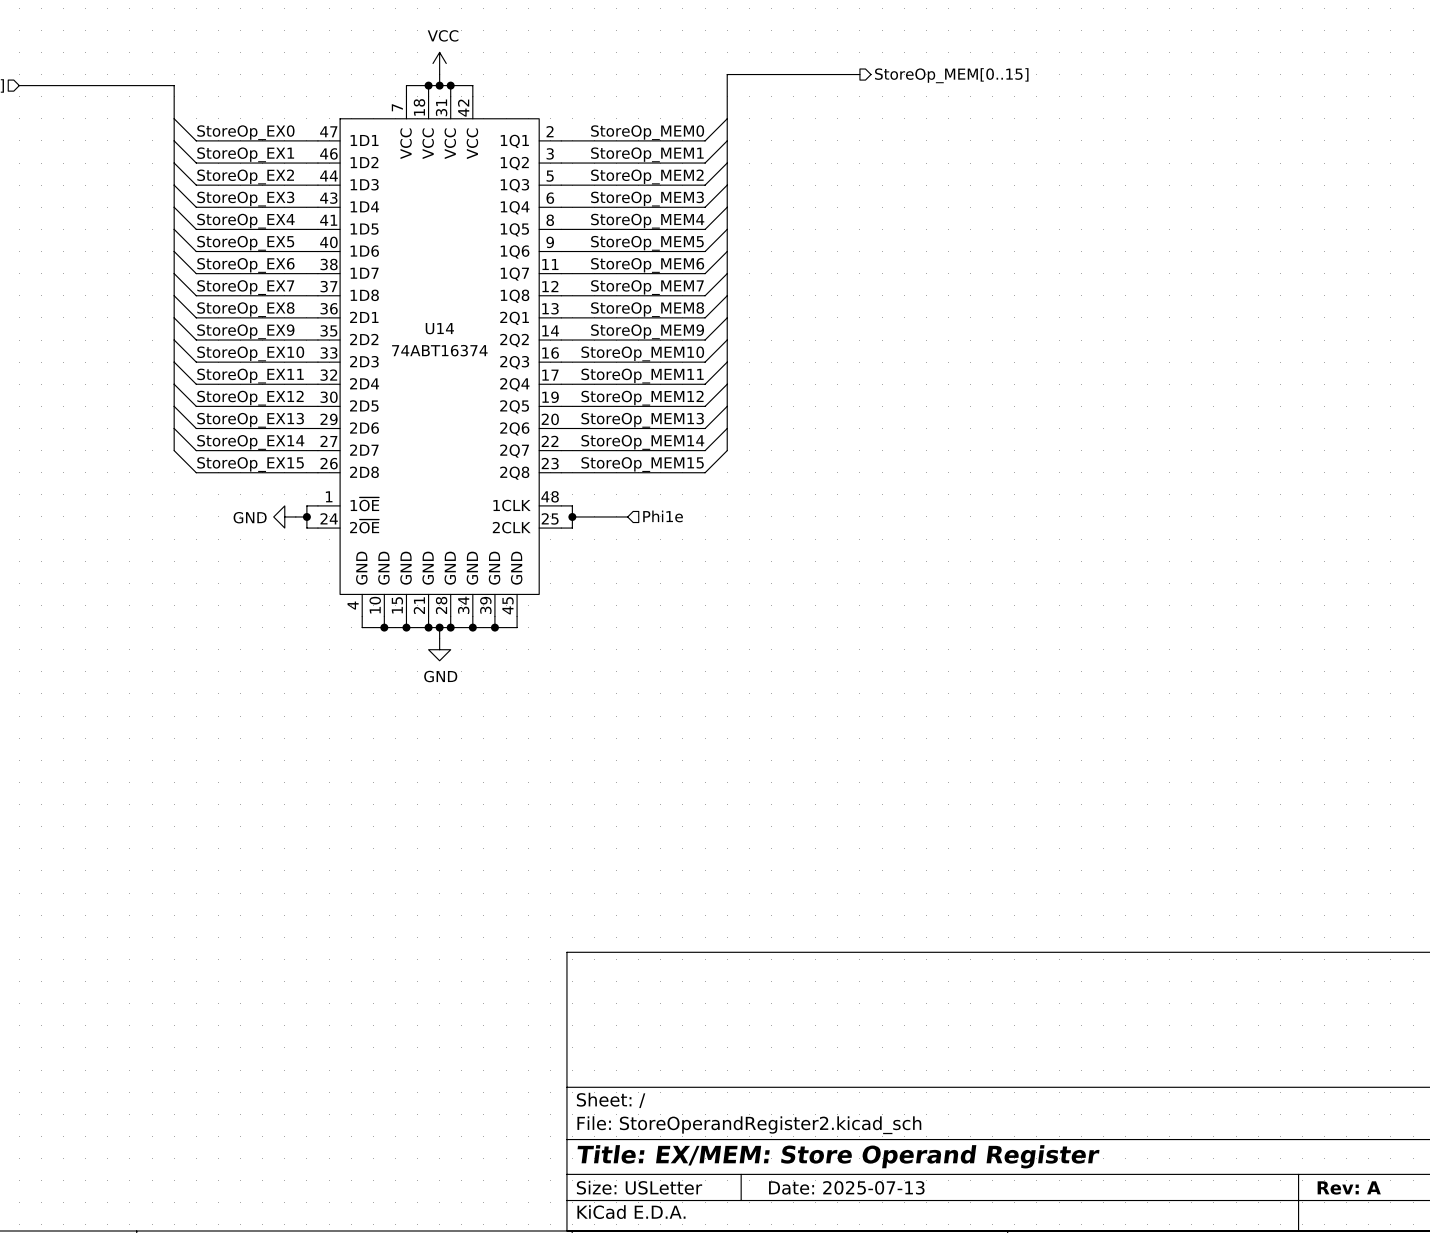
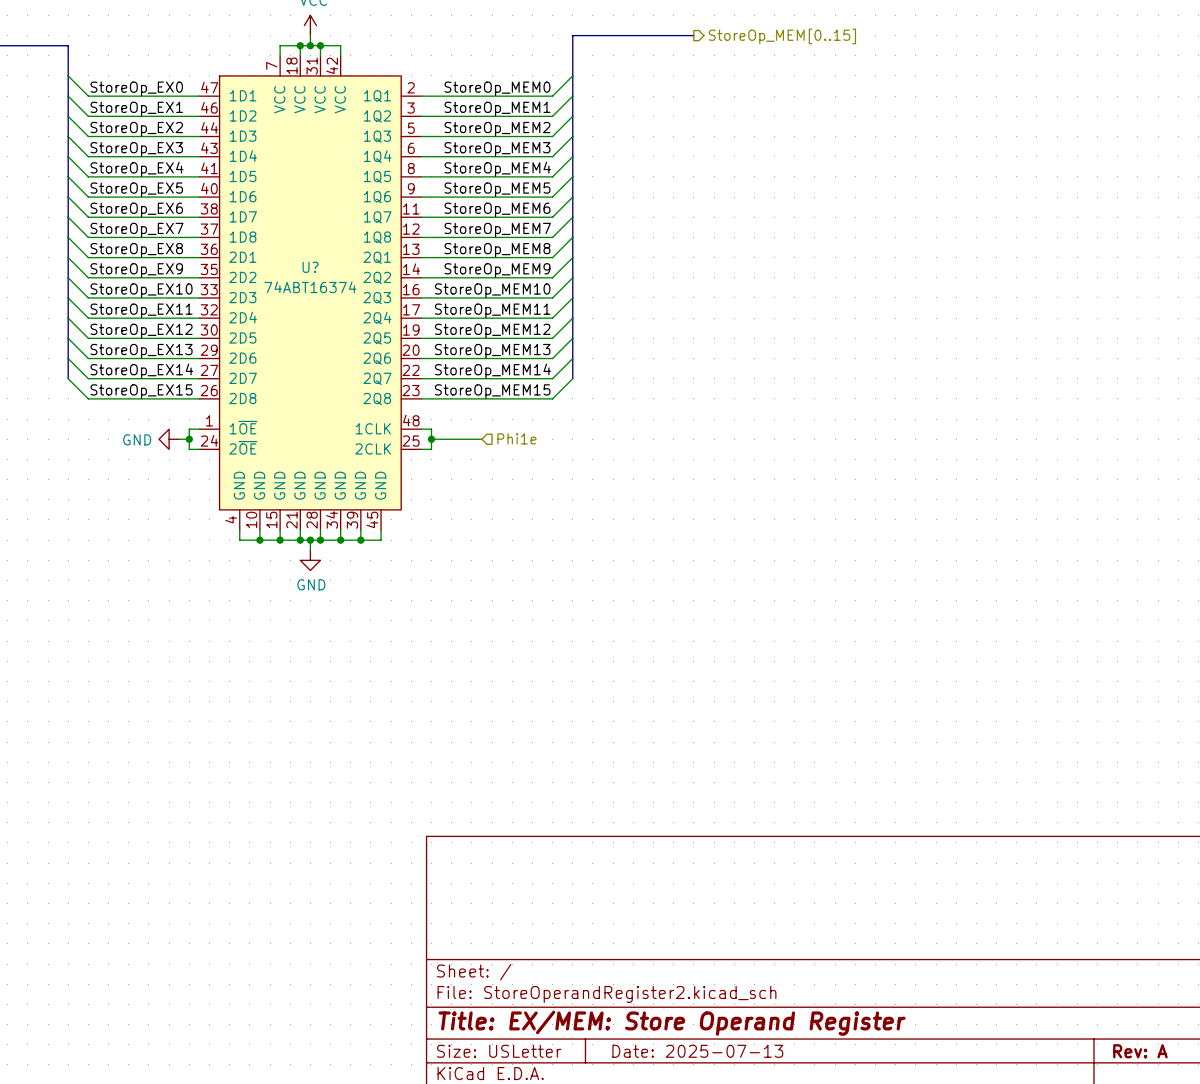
U14 name: U14 (439, 328) -> U? (310, 267)

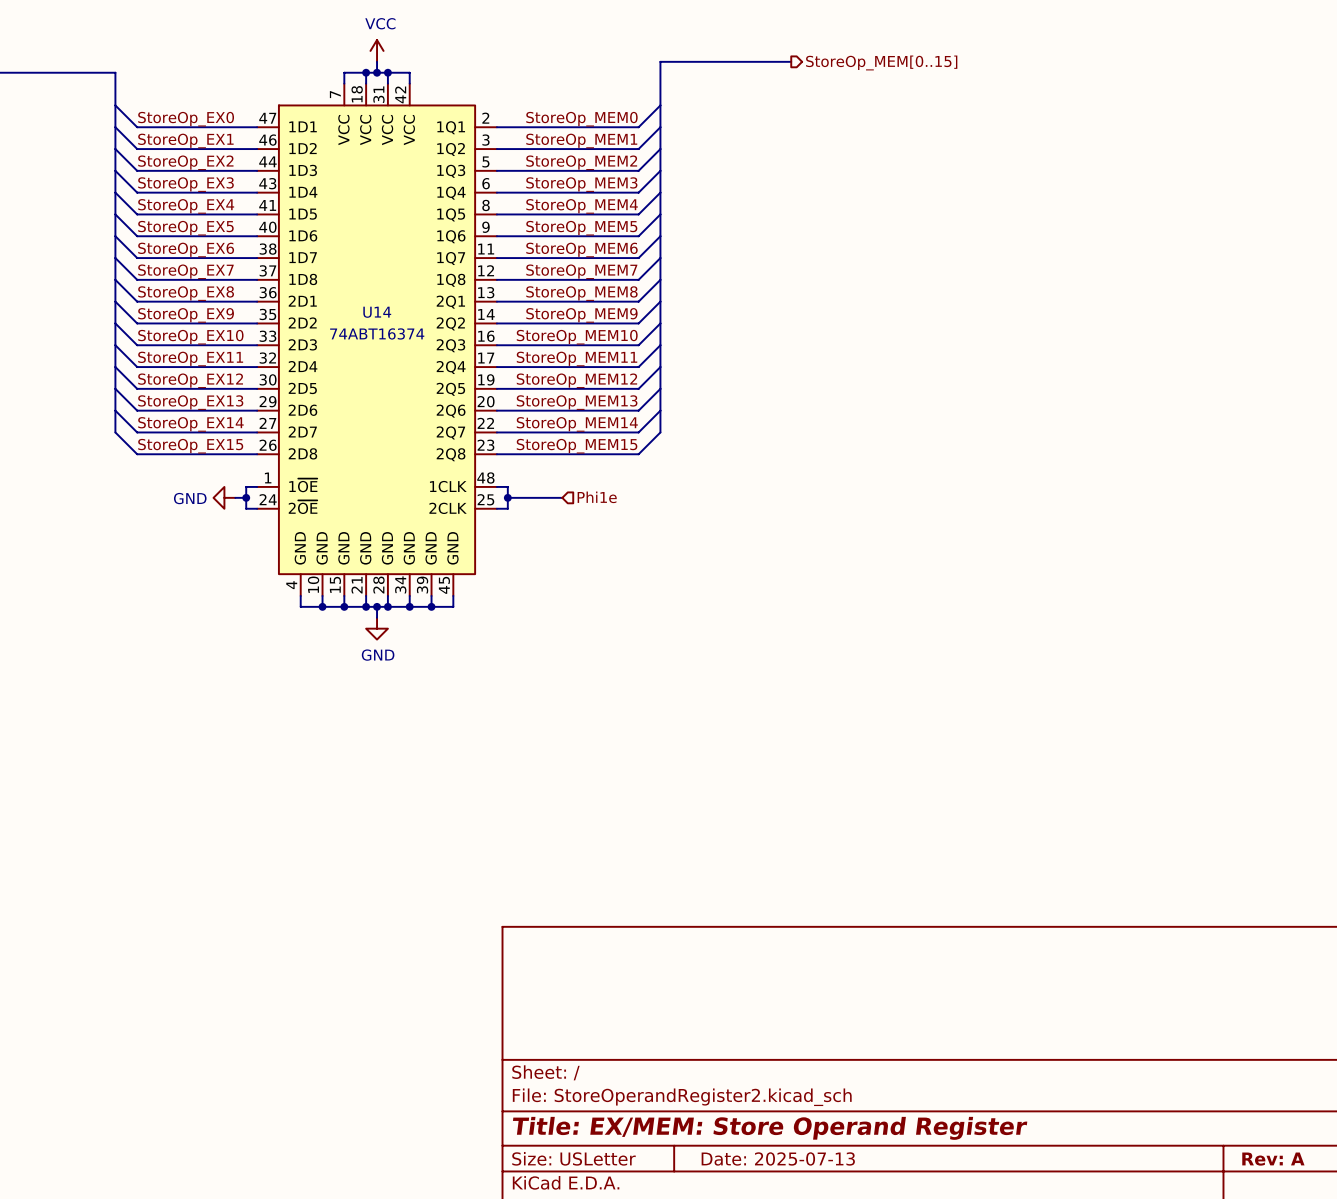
U? name: U? (310, 267) -> U14 (377, 312)

